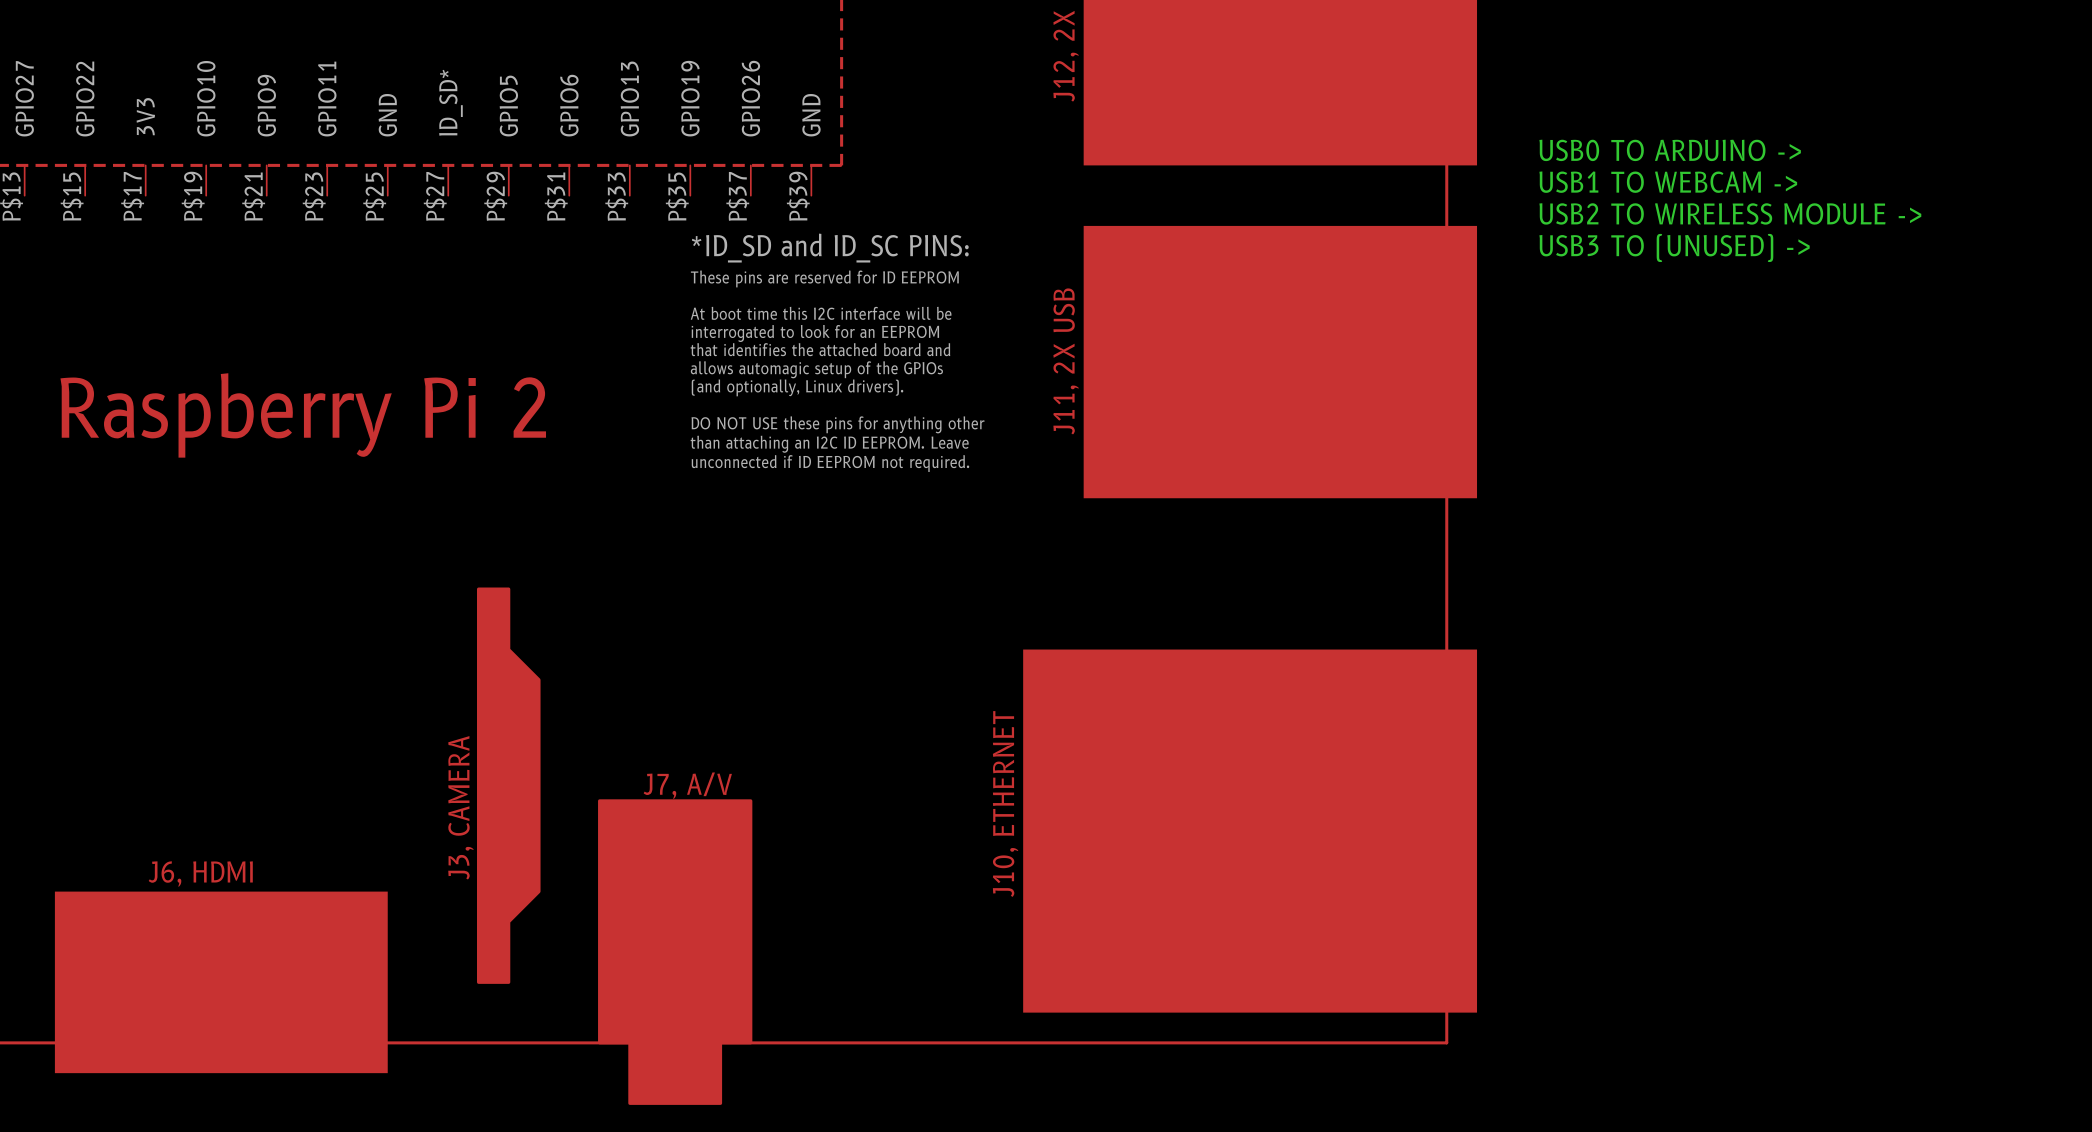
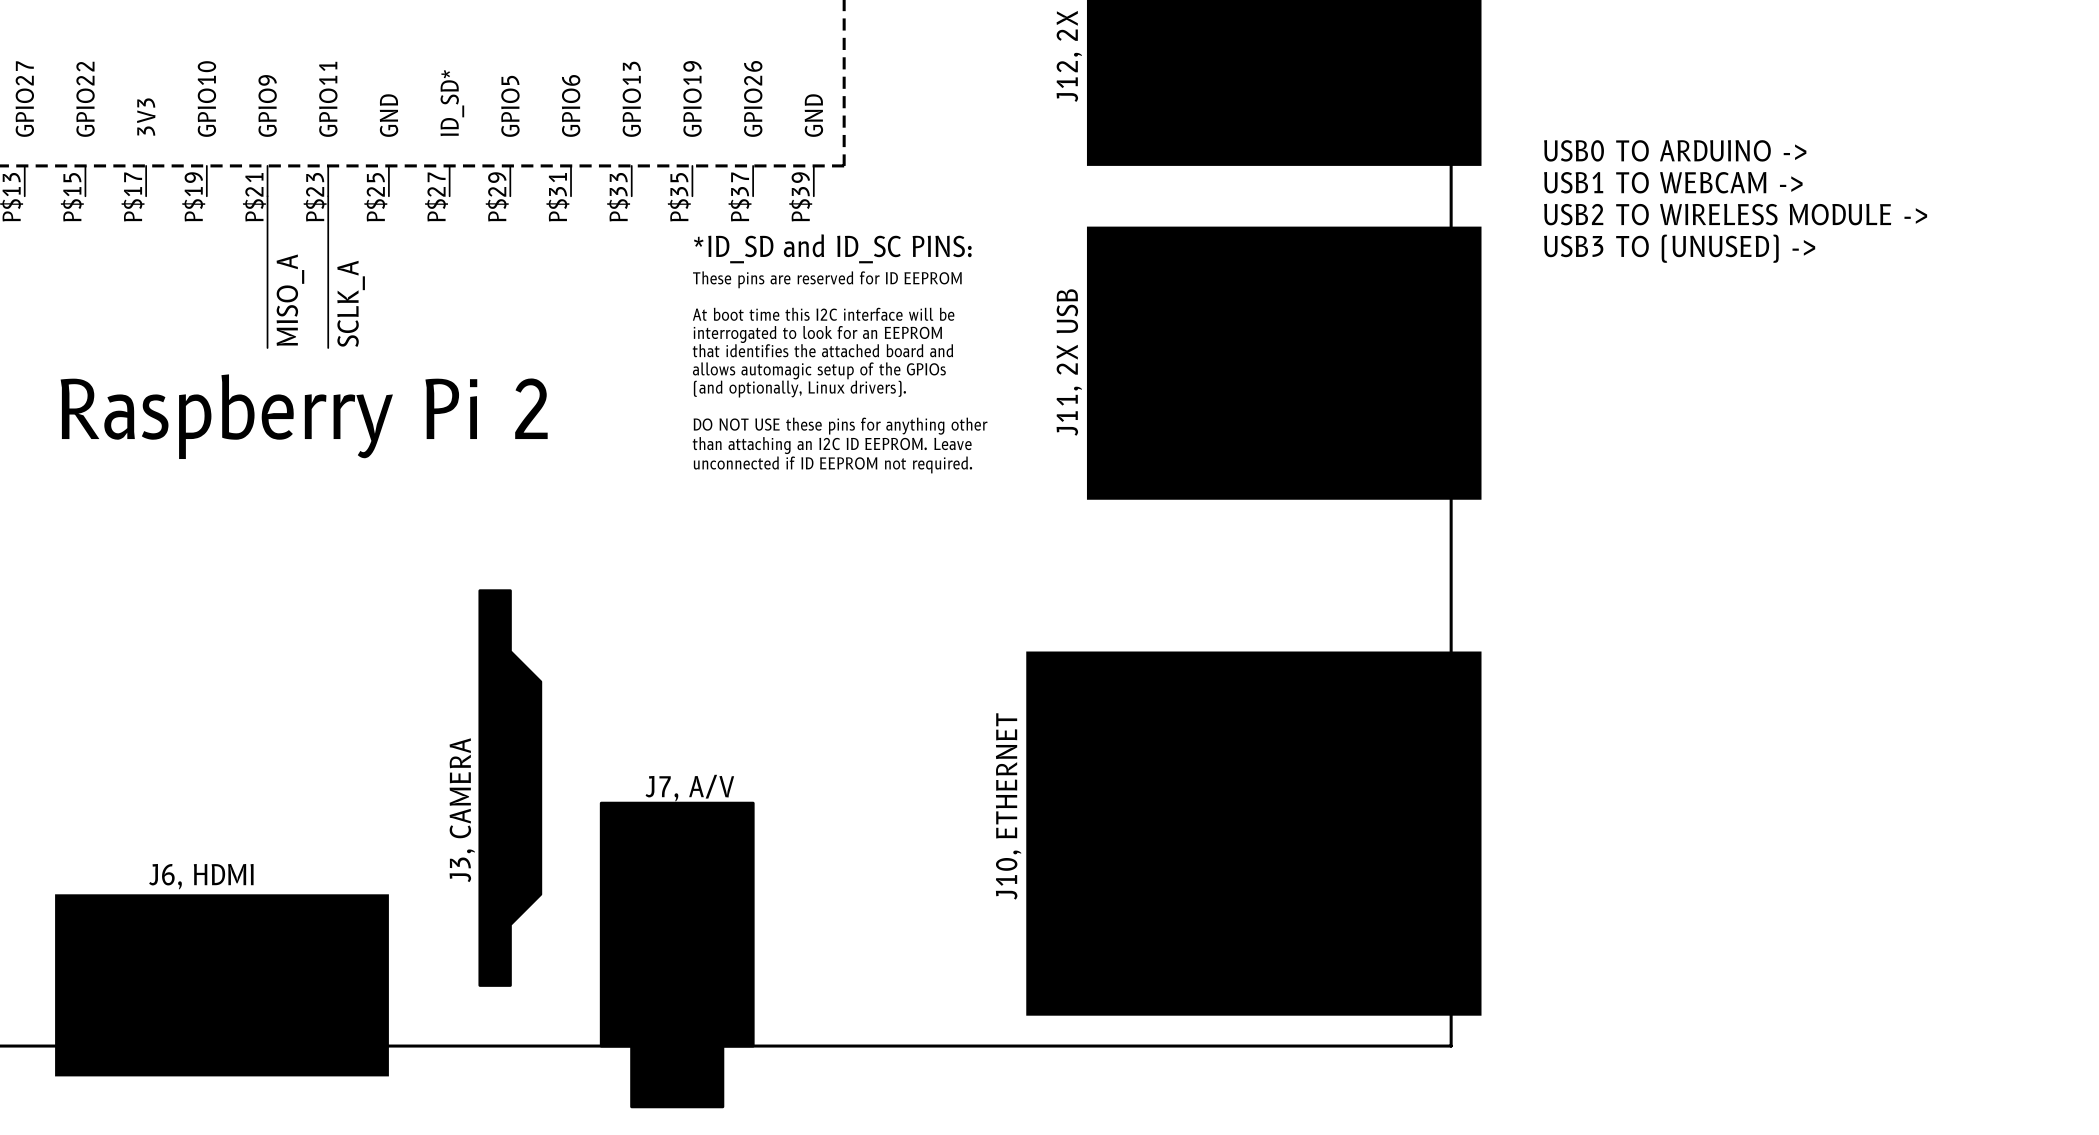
wire: none -> (267, 196) (267, 348)
wire: none -> (328, 196) (328, 348)
label: none -> MISO_A (290, 300)
label: none -> SCLK_A (351, 303)

